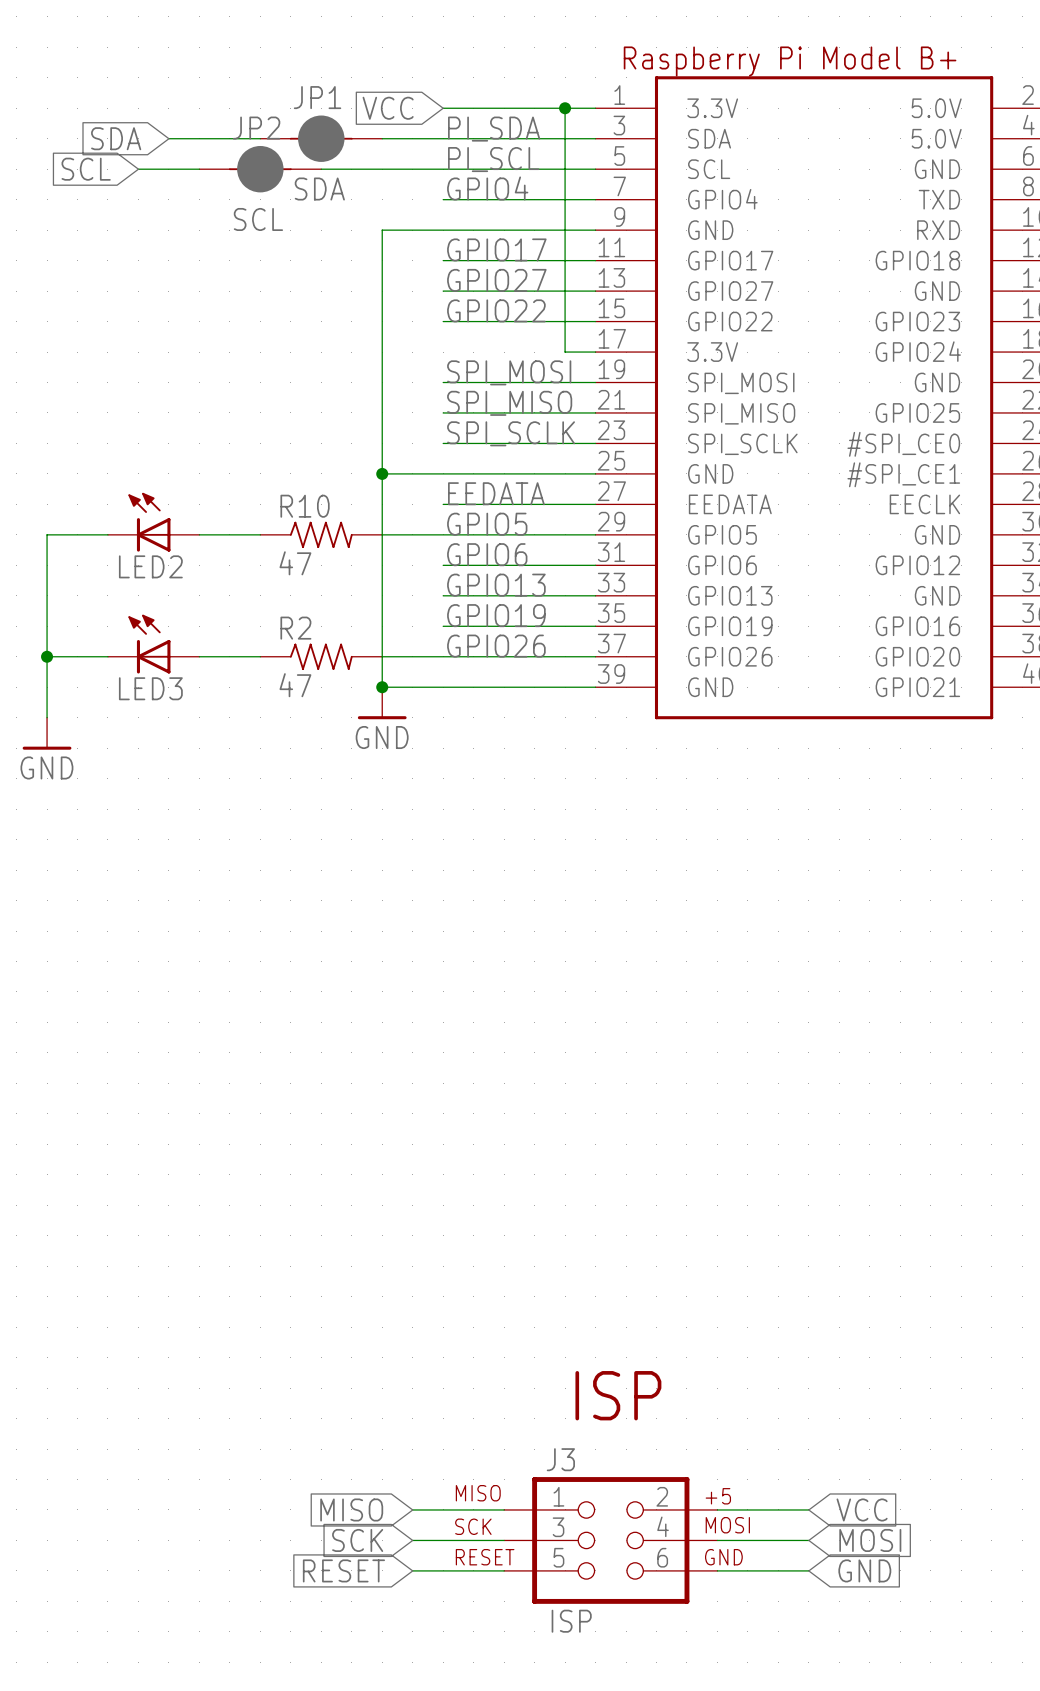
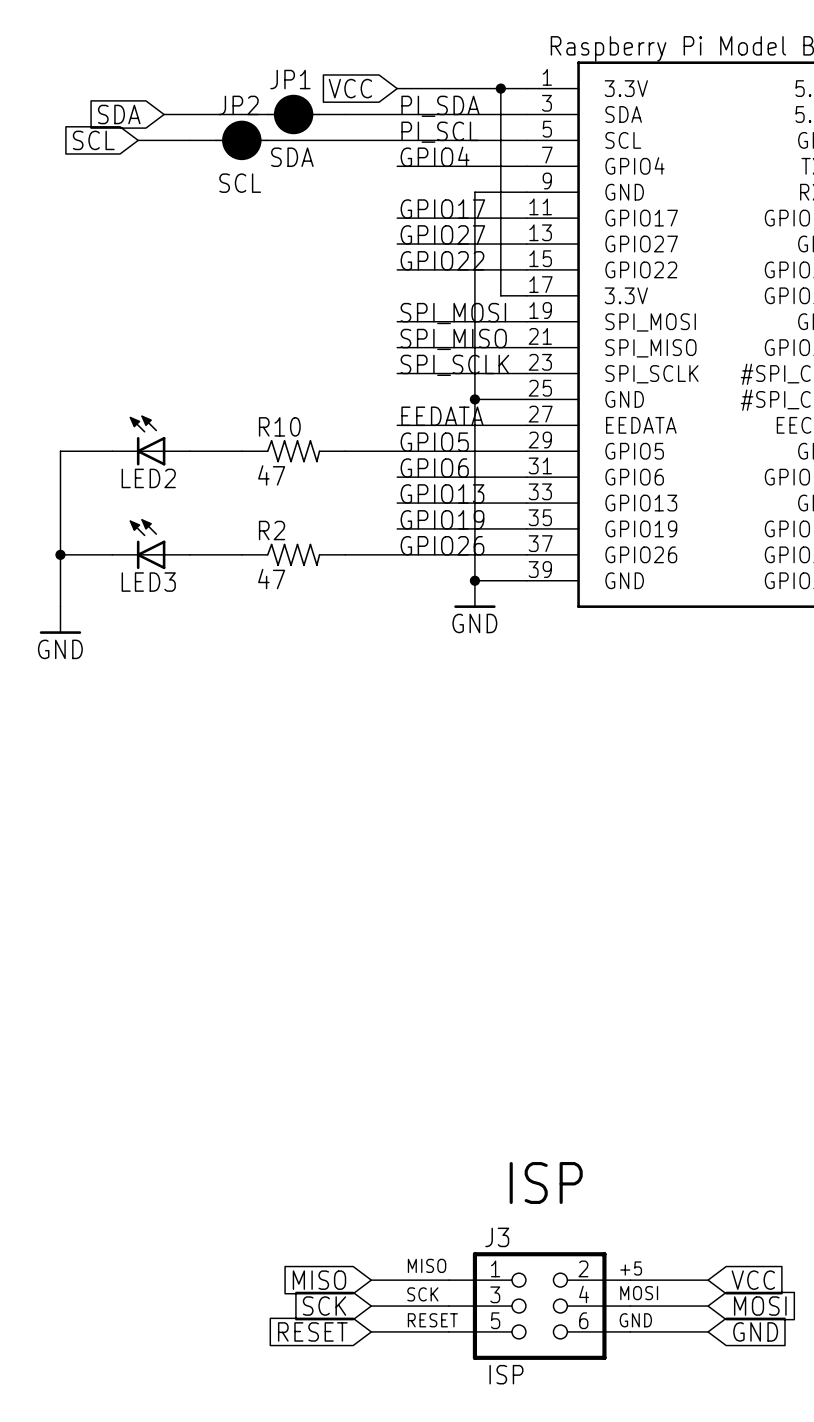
wire: (534, 230) (382, 230) (382, 687) (534, 687) -> (474, 192) (474, 580)
wire: (382, 473) (534, 473) -> none
junction: (382, 473) -> none
junction: none -> (474, 399)
junction: (382, 687) -> none
junction: none -> (474, 580)
power symbol position: GND (382, 703) -> GND (474, 594)

